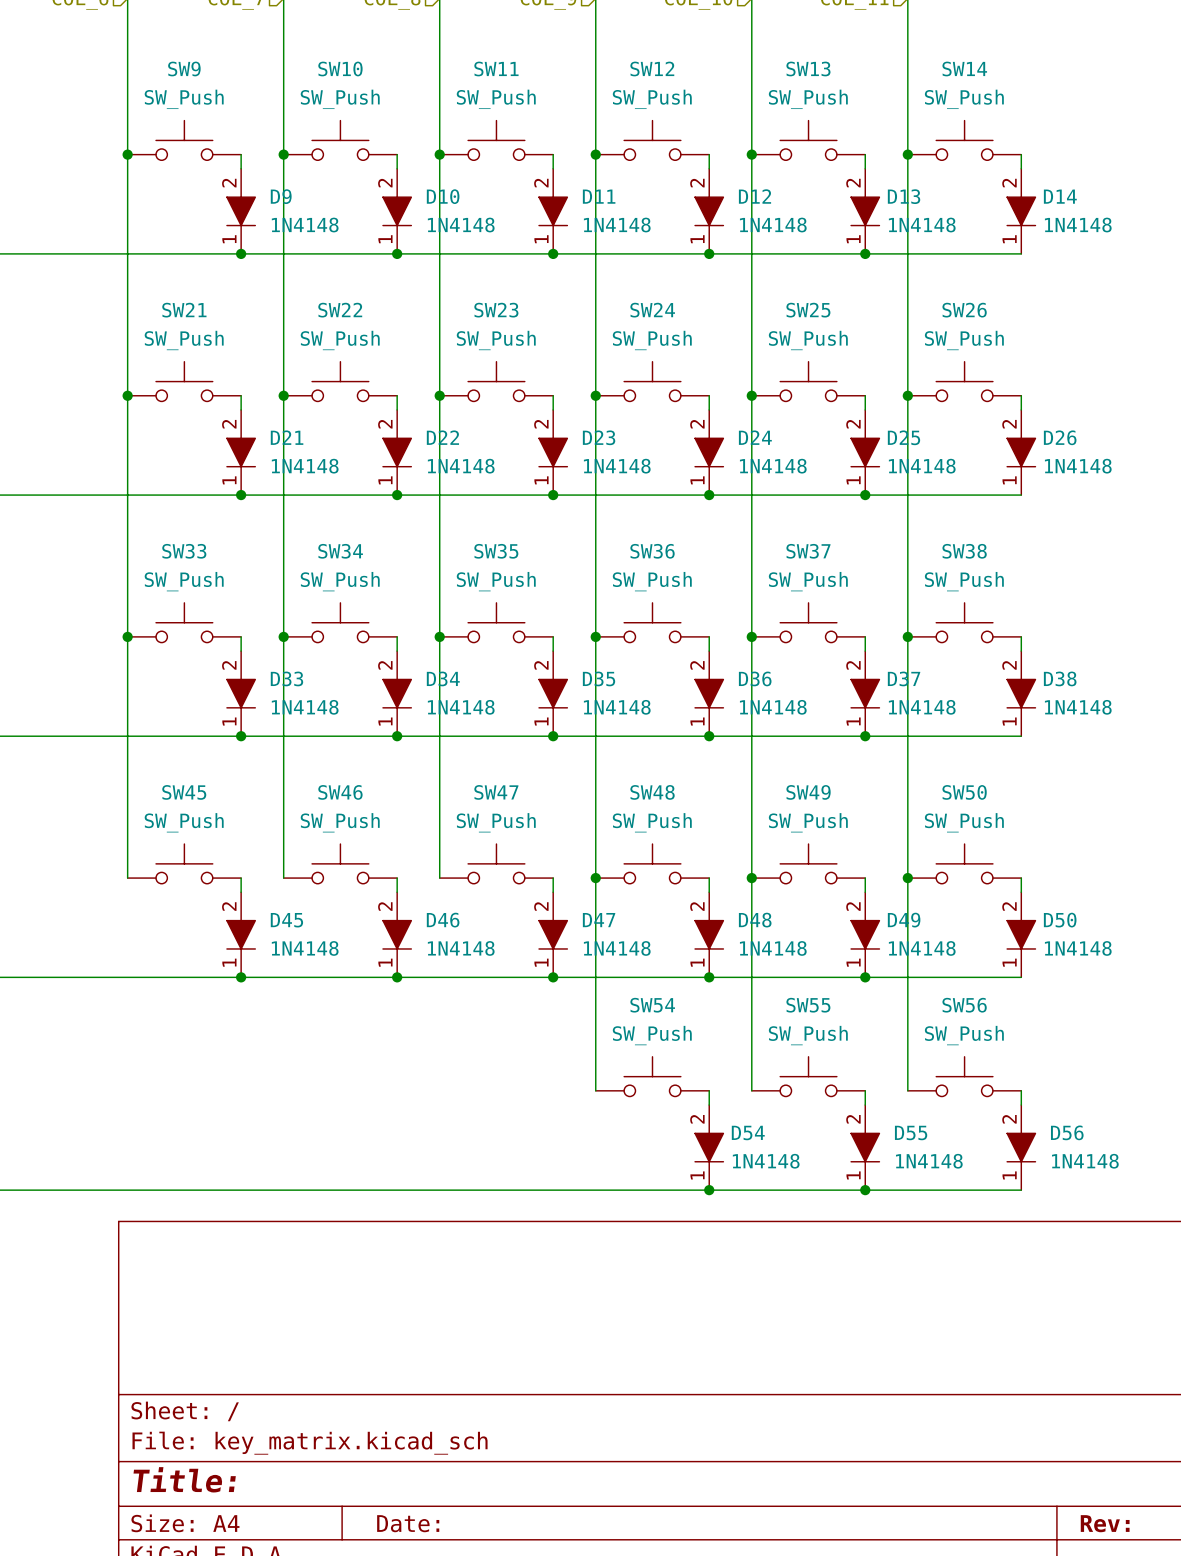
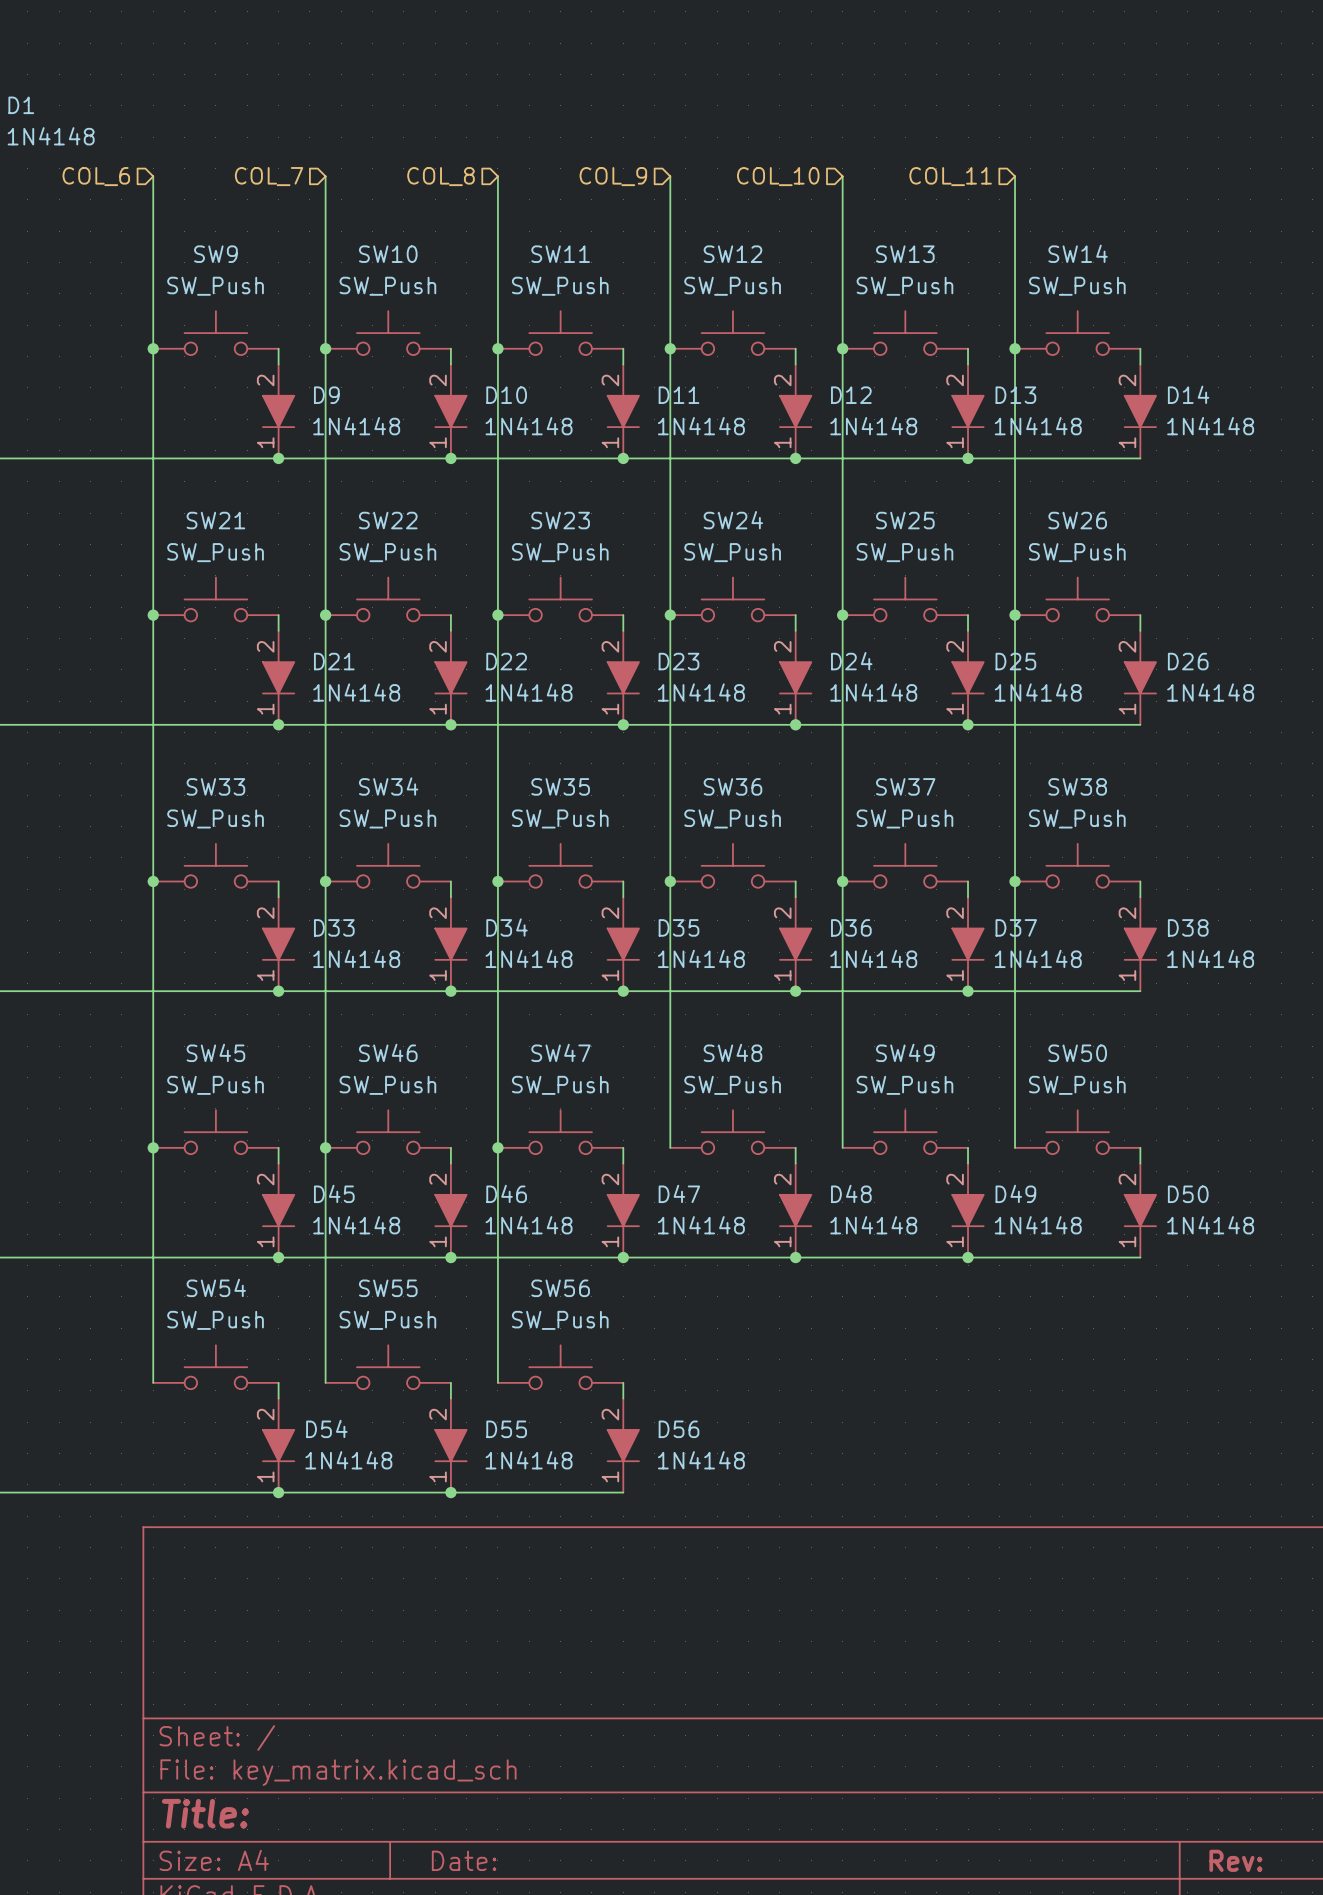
wire: none -> (153, 1147) (153, 1382)
junction: none -> (153, 1147)
wire: none -> (325, 1147) (325, 1382)
junction: none -> (325, 1147)
junction: none -> (497, 1147)
wire: (595, 878) (595, 1090) -> (497, 1147) (497, 1382)
junction: (595, 878) -> none
wire: (751, 878) (751, 1090) -> none
junction: (751, 878) -> none
wire: (907, 878) (907, 1090) -> none
junction: (907, 878) -> none
SW54 position: (652, 1076) -> (215, 1367)
SW55 position: (808, 1076) -> (388, 1367)
SW56 position: (964, 1076) -> (560, 1367)
wire: none -> (278, 1382) (278, 1398)
wire: none -> (450, 1382) (450, 1398)
wire: (709, 1090) (709, 1105) -> (623, 1382) (623, 1398)
wire: (865, 1090) (865, 1105) -> none
wire: (1021, 1090) (1021, 1105) -> none
D54 position: (709, 1147) -> (278, 1445)
D55 position: (865, 1147) -> (450, 1445)
D56 position: (1021, 1147) -> (623, 1445)
junction: none -> (278, 1492)
junction: none -> (450, 1492)
wire: (553, 1190) (1021, 1190) -> none
junction: (709, 1190) -> none
junction: (865, 1190) -> none

